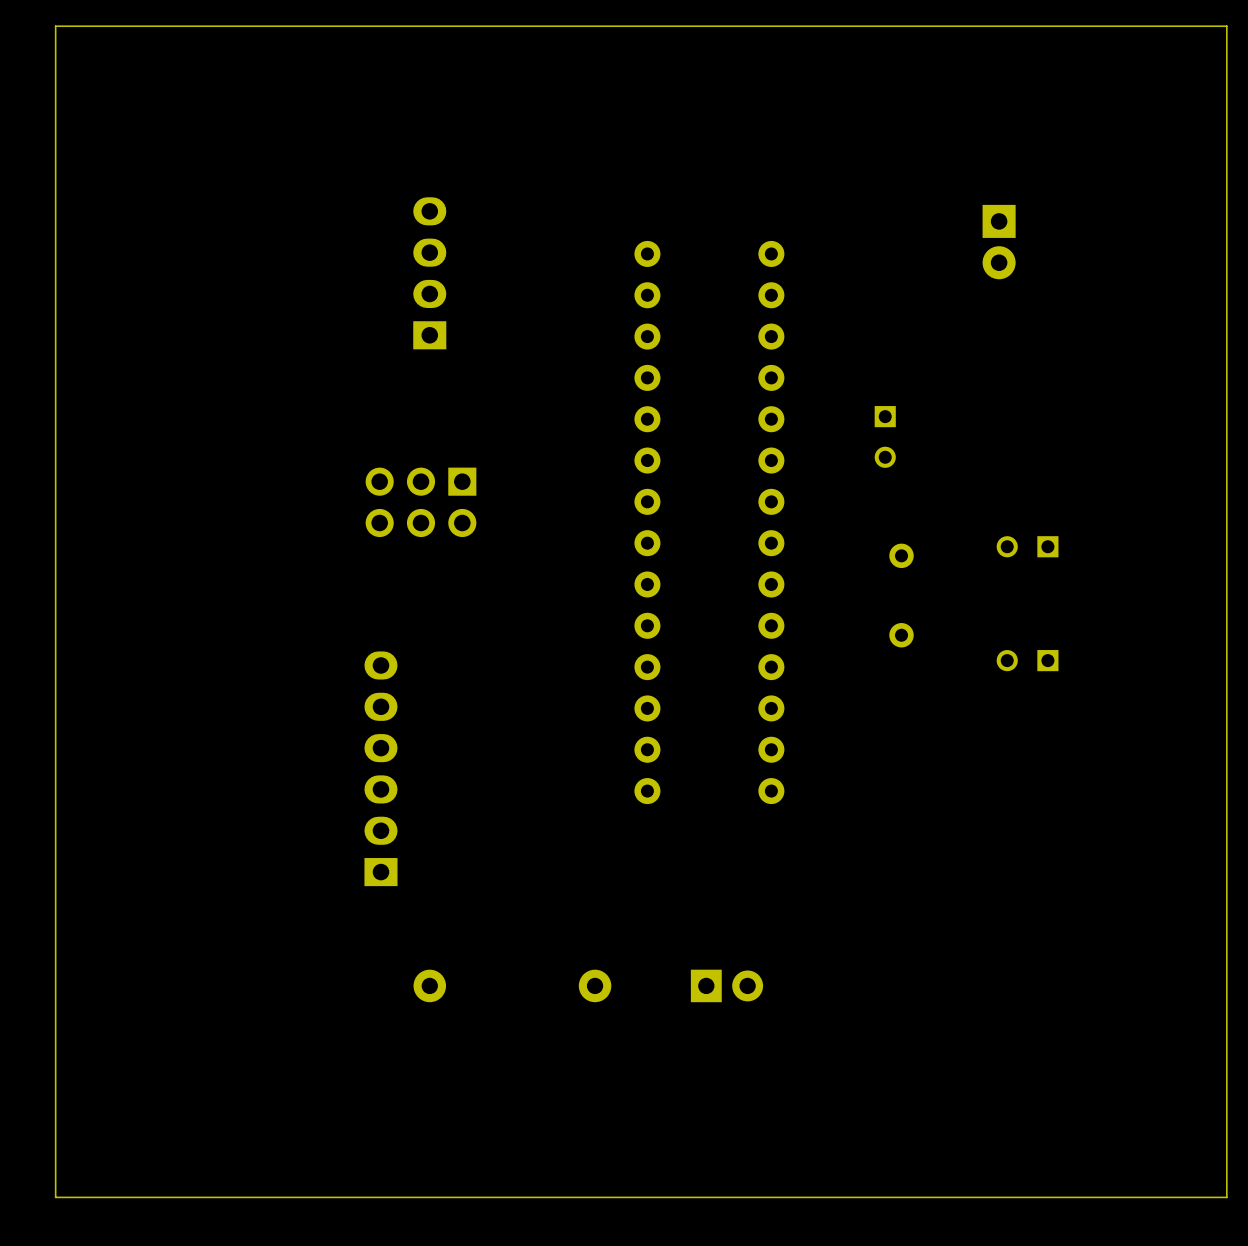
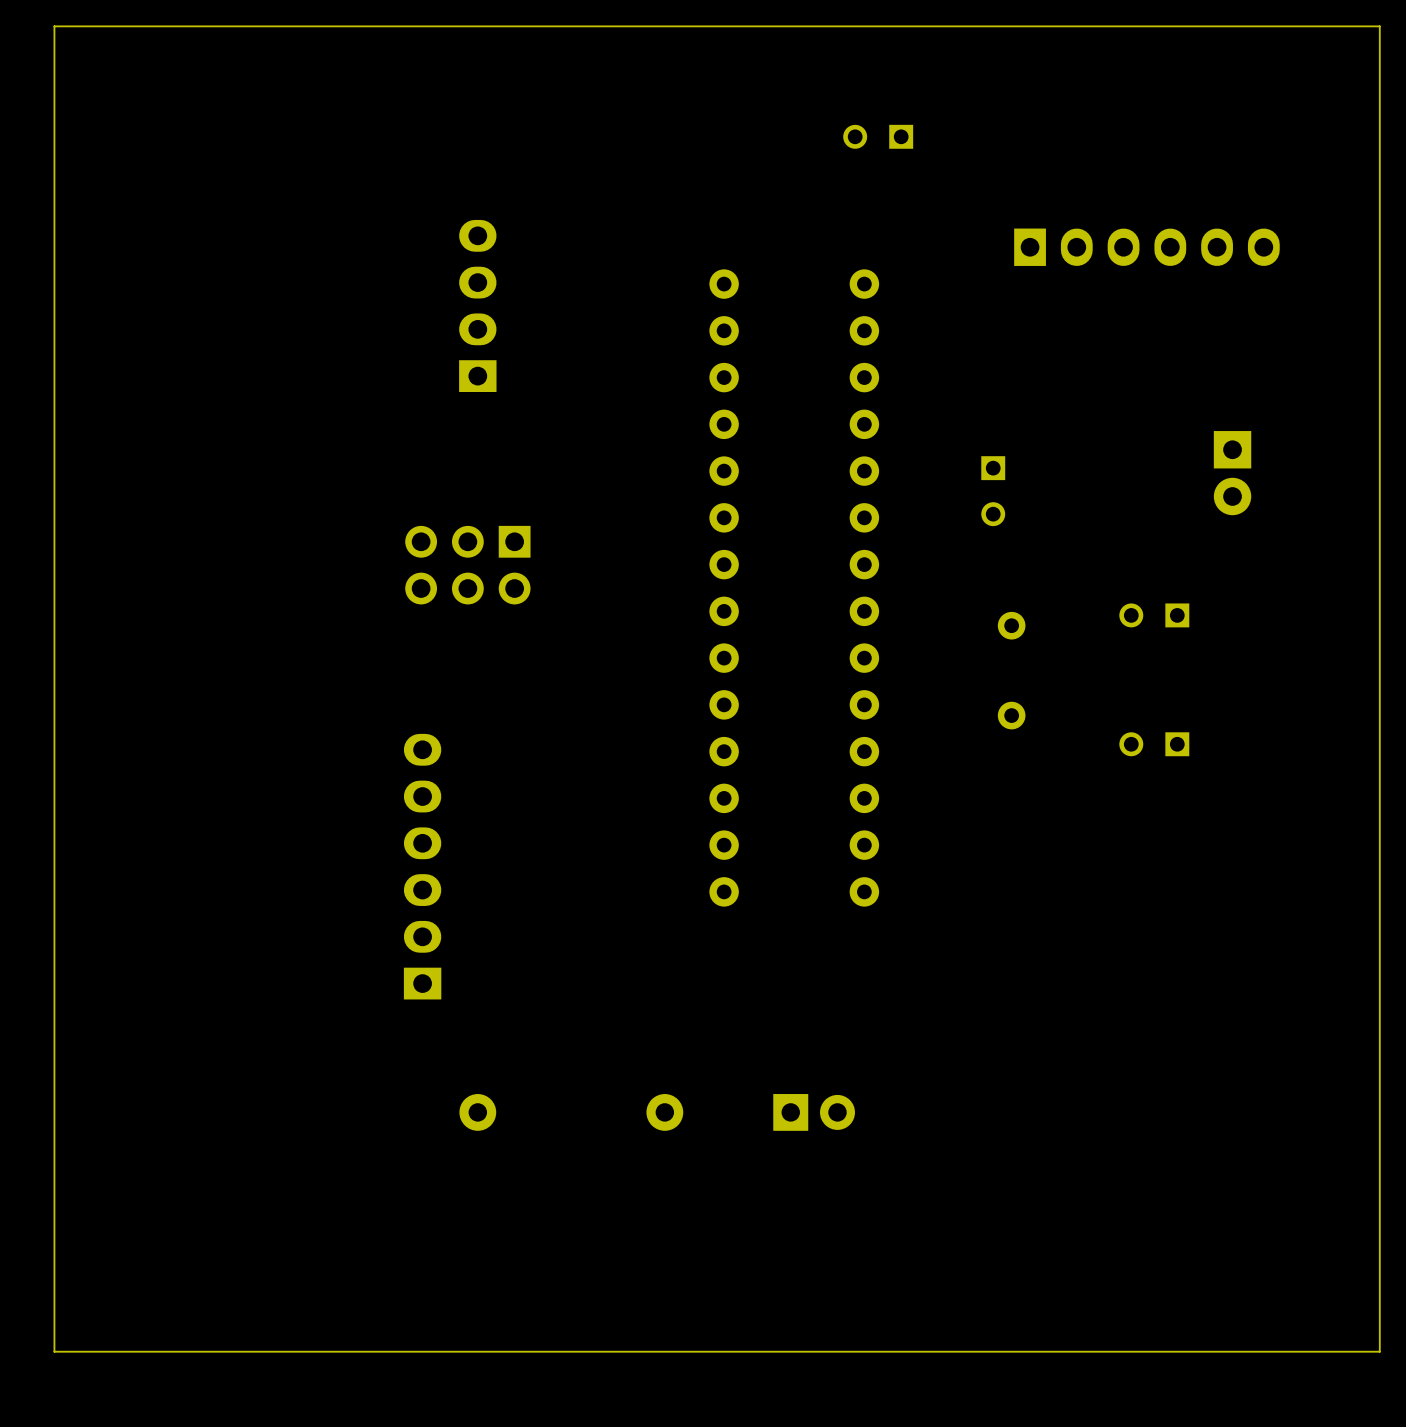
part: none -> (878, 136)
part: none -> (1146, 247)
part position: (999, 242) -> (1232, 473)

